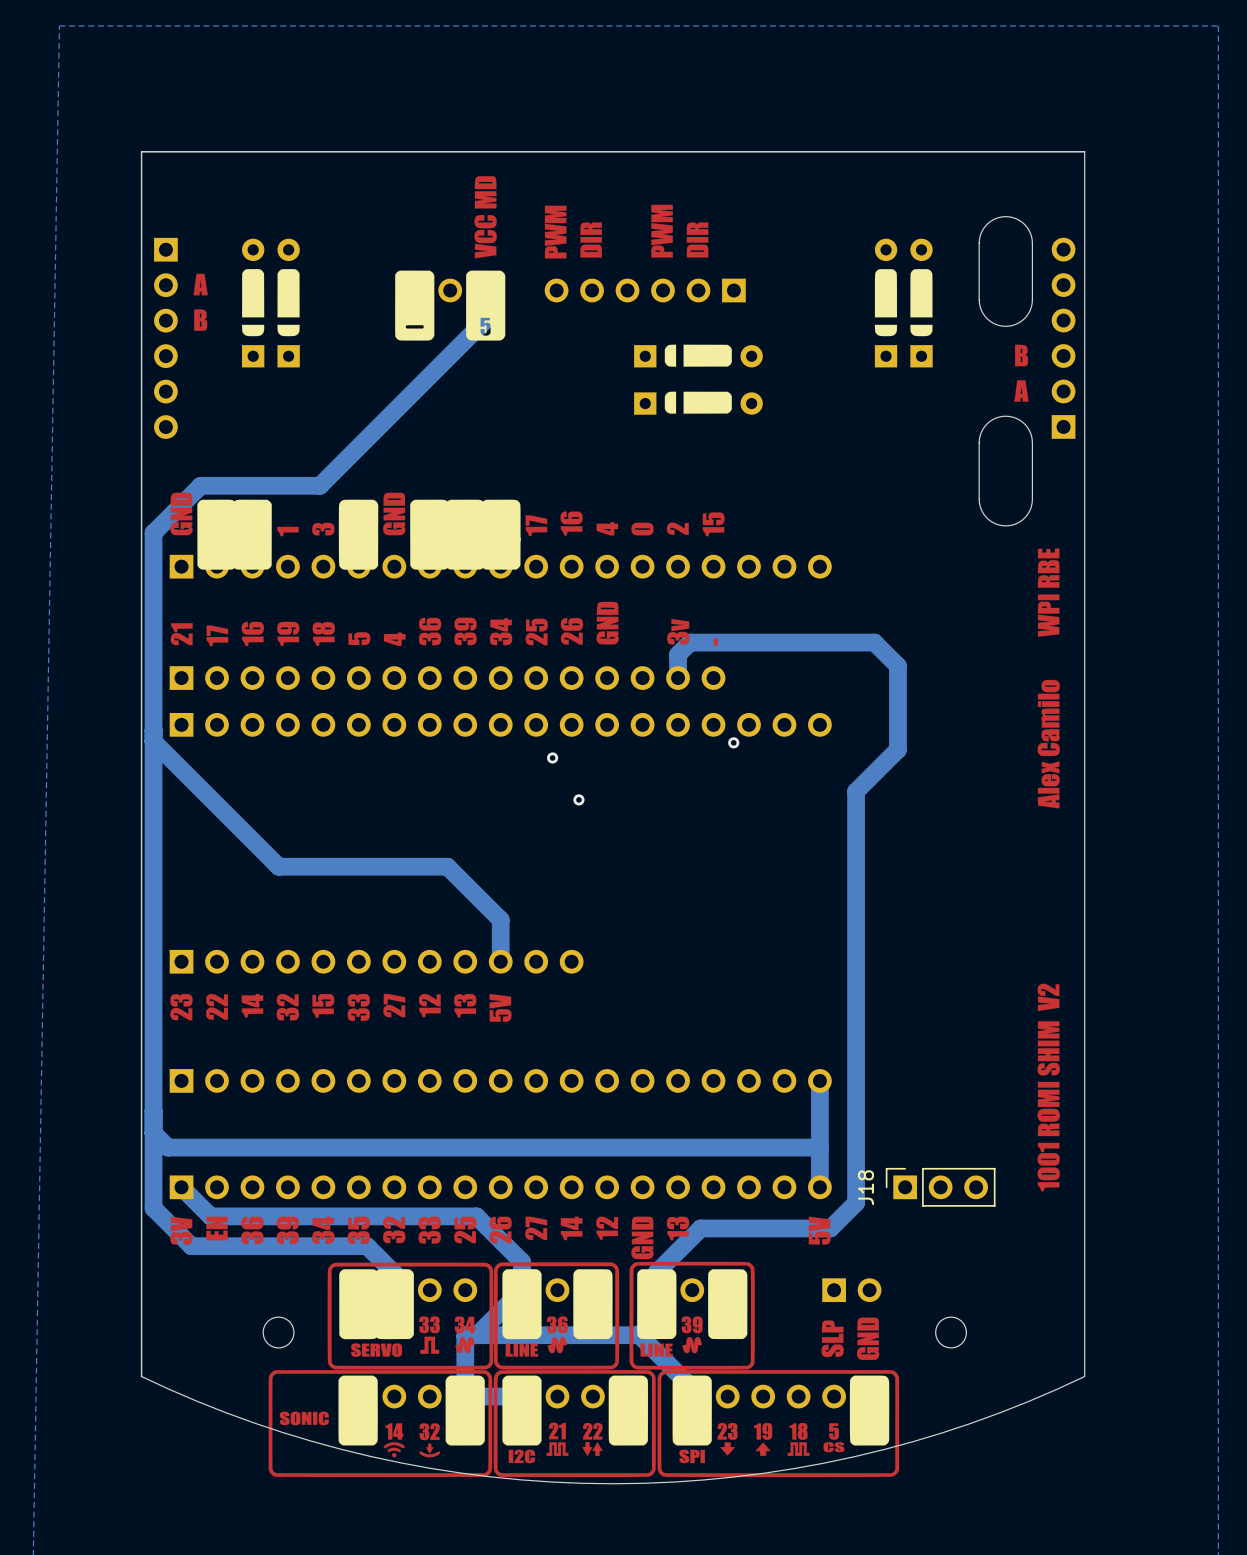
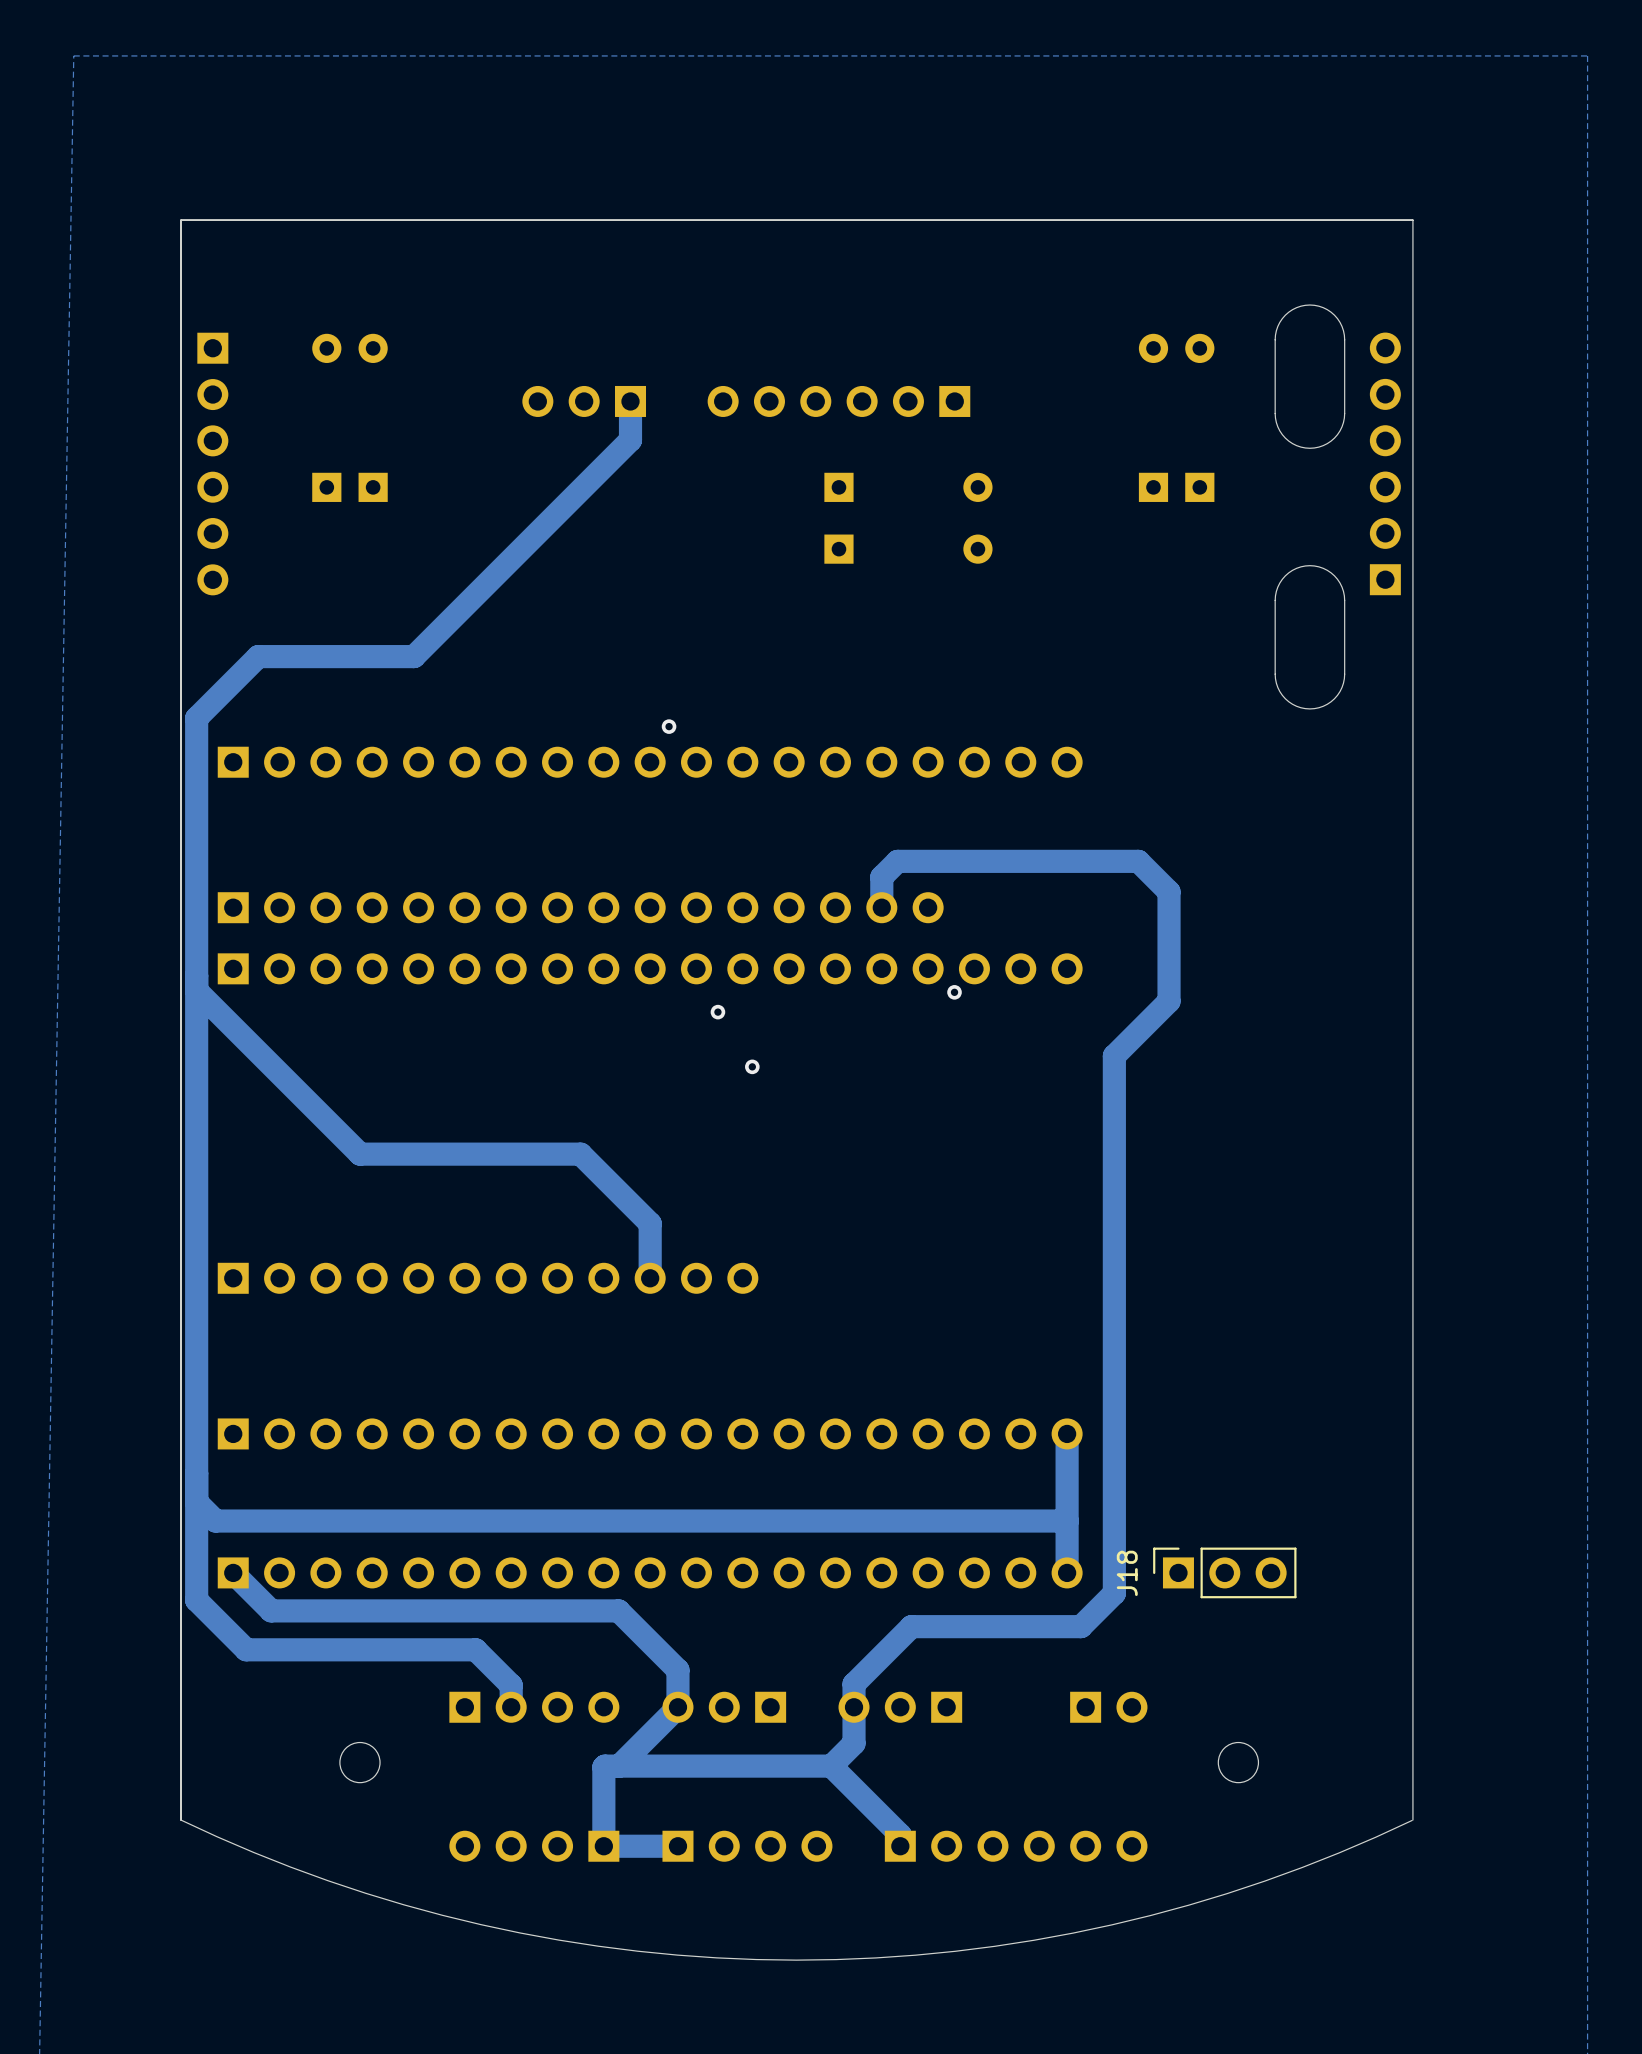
drawing: [170, 176, 1060, 1478] -> none

